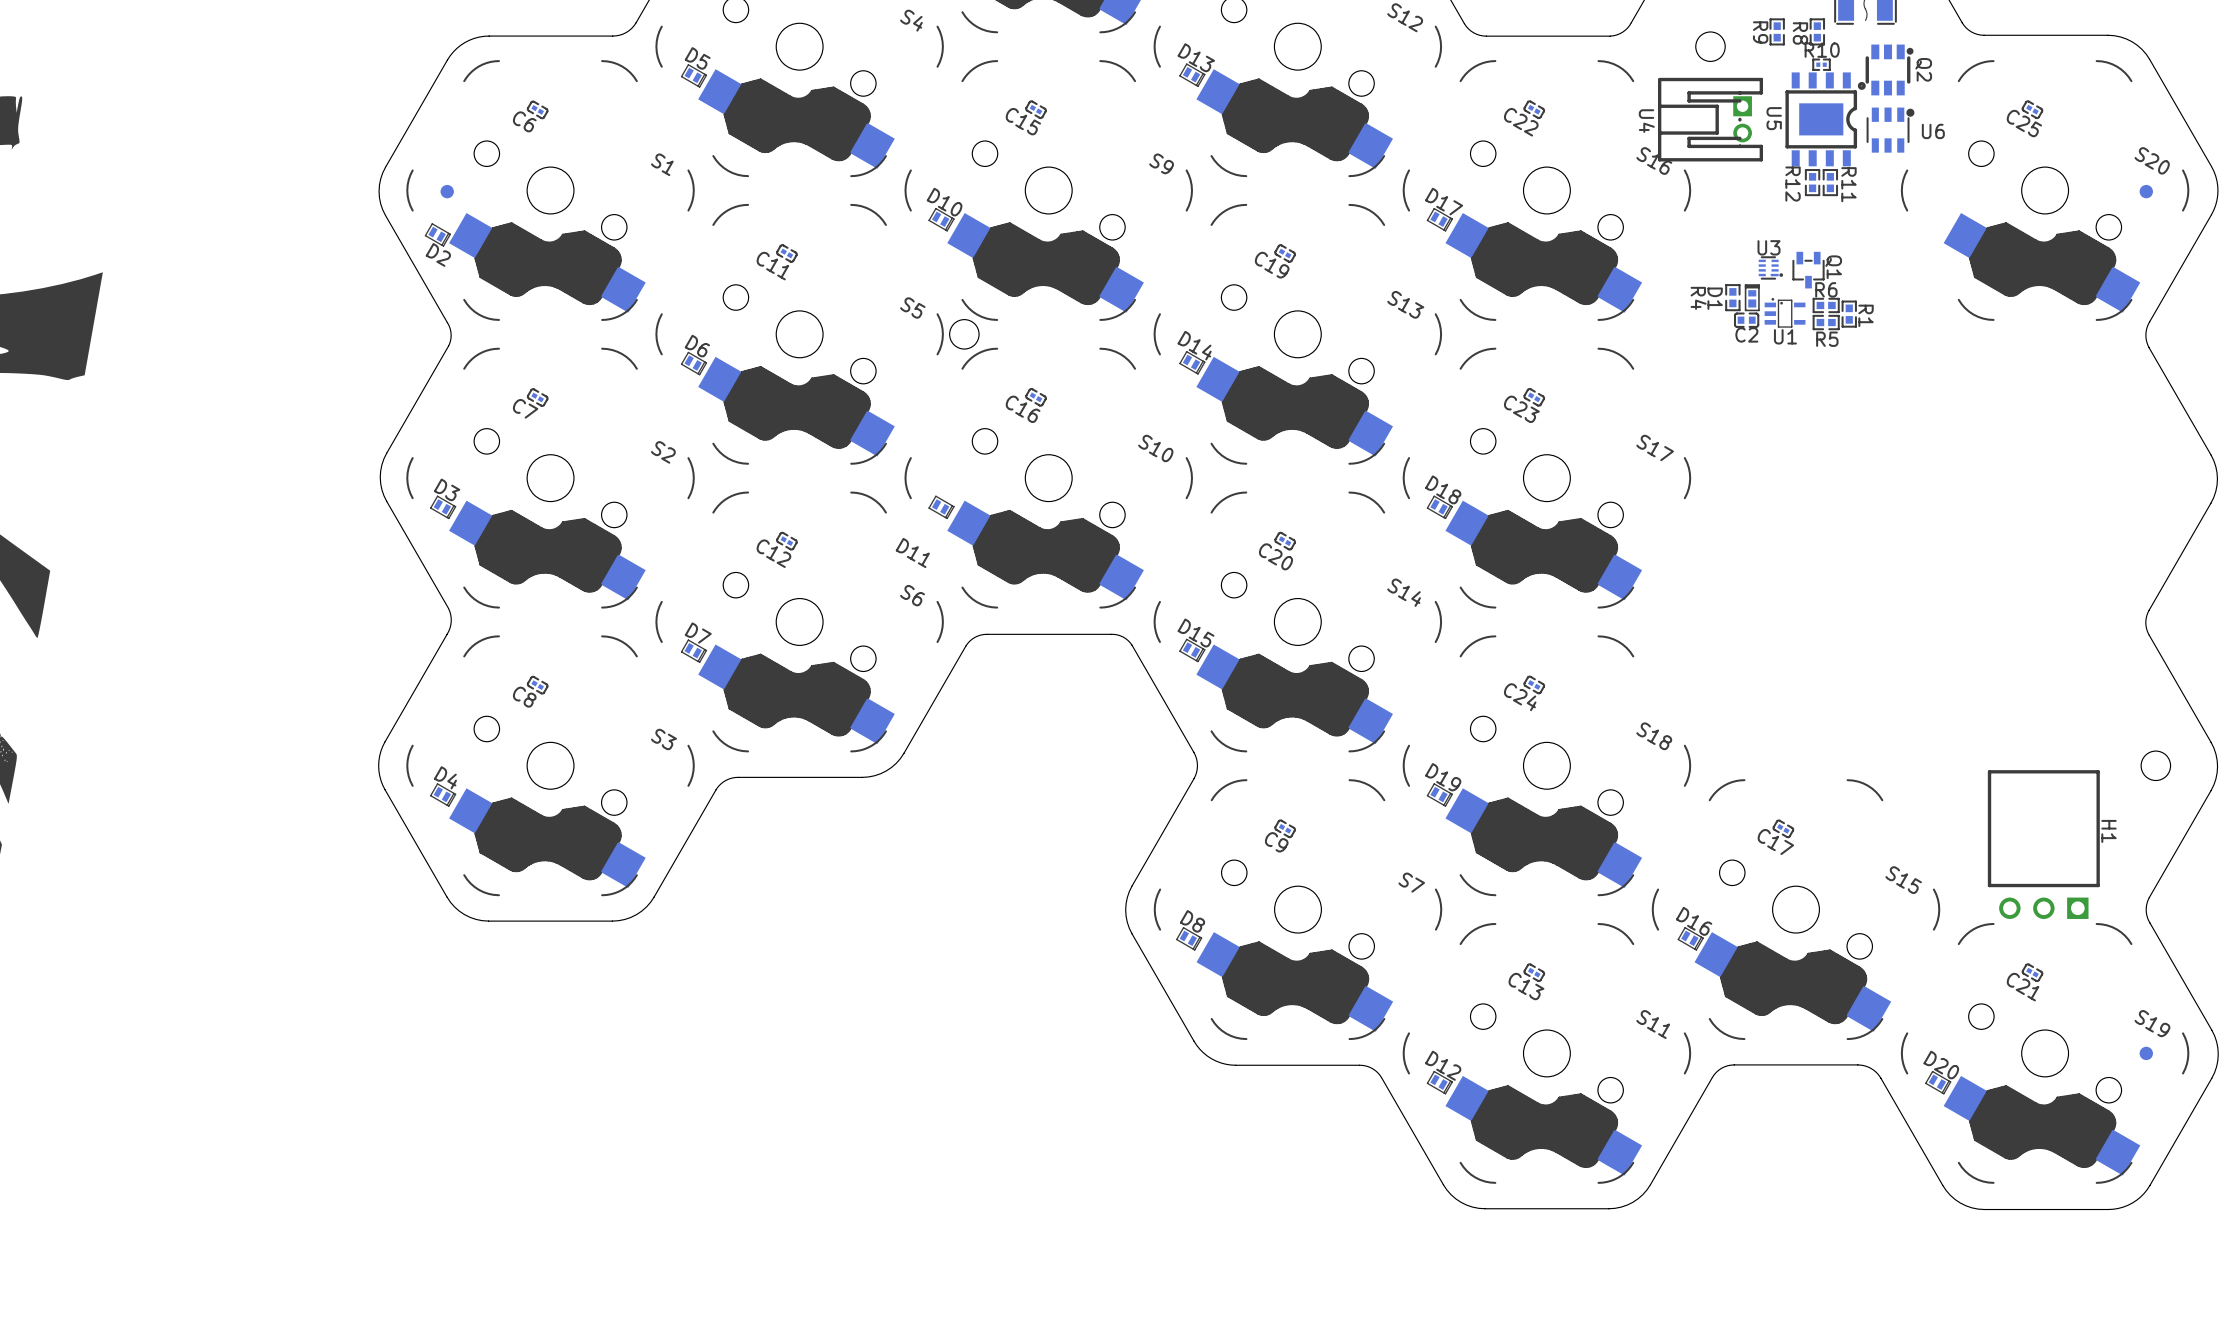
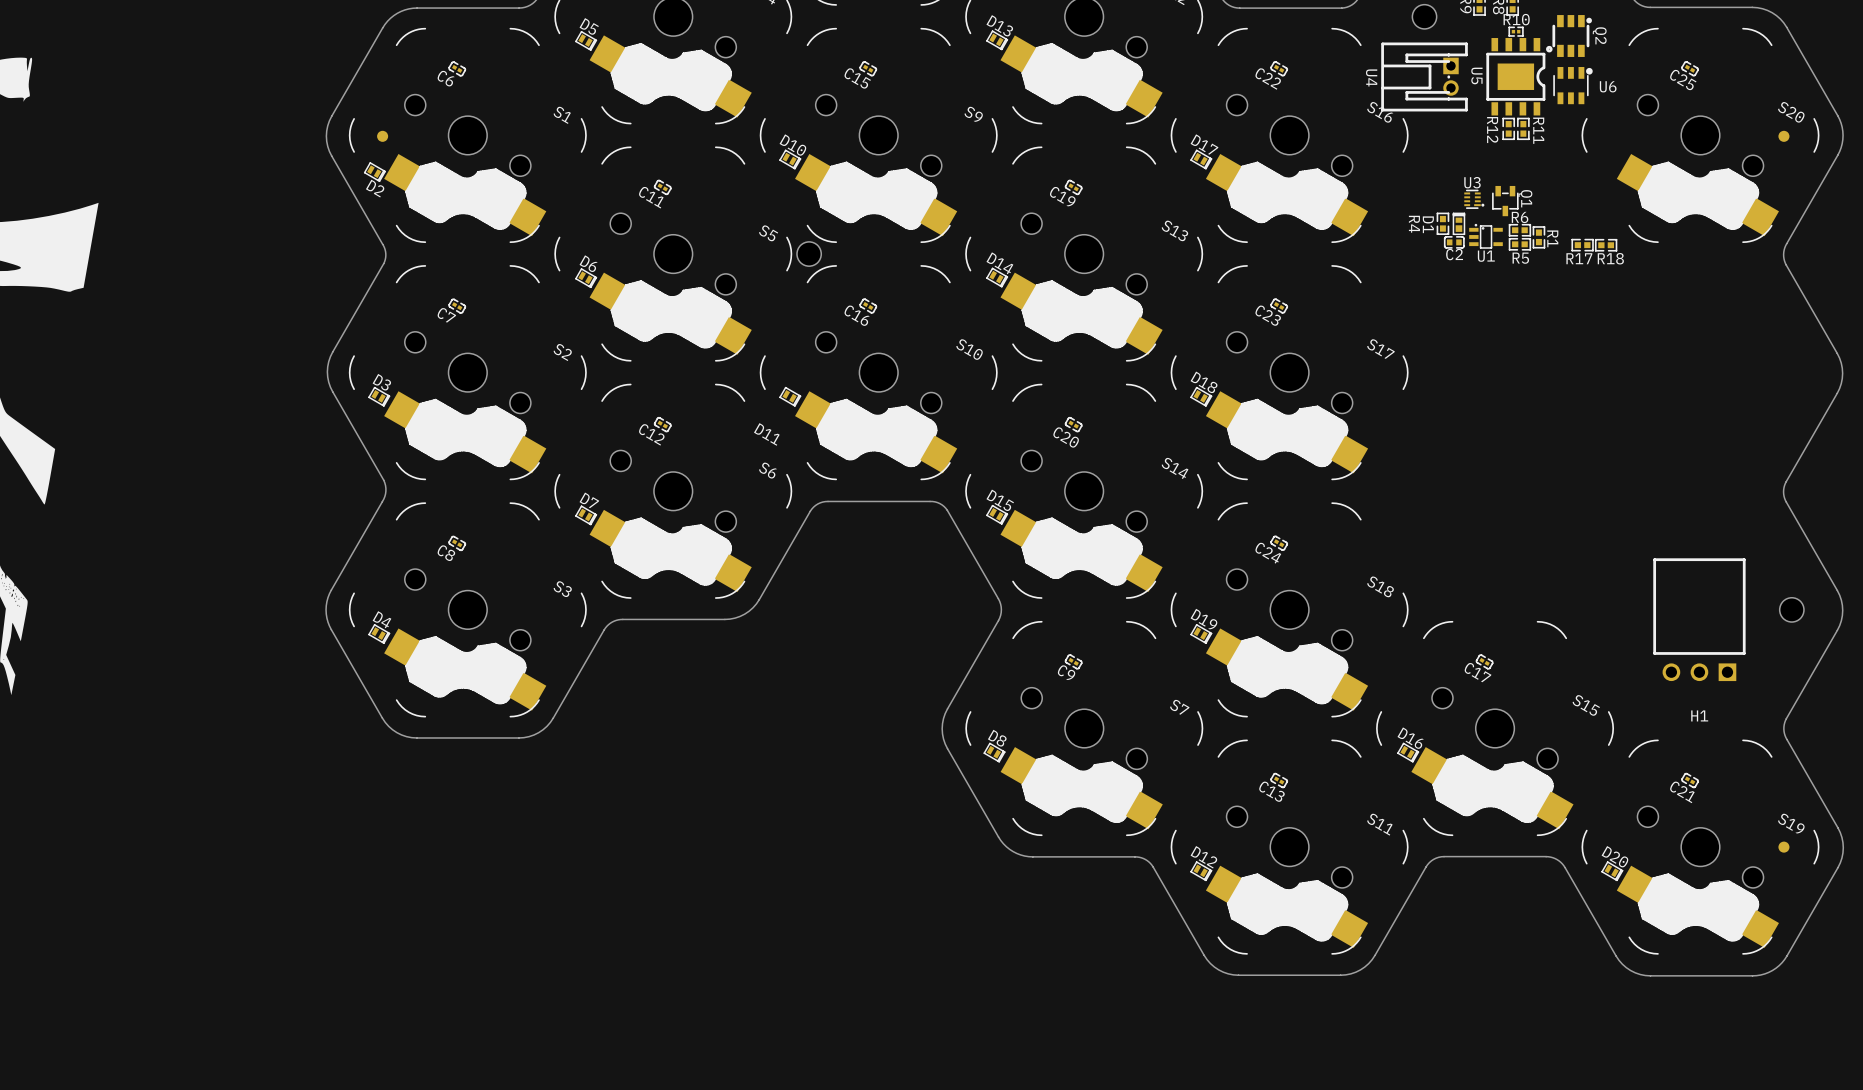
R17: none -> (1582, 245)
R18: none -> (1606, 245)
H1 name rotation: 0° (2108, 831) -> 90° counterclockwise (1699, 715)
H1 name position: H1 (2108, 831) -> H1 (1699, 715)
H1 position: (2043, 844) -> (1699, 619)

